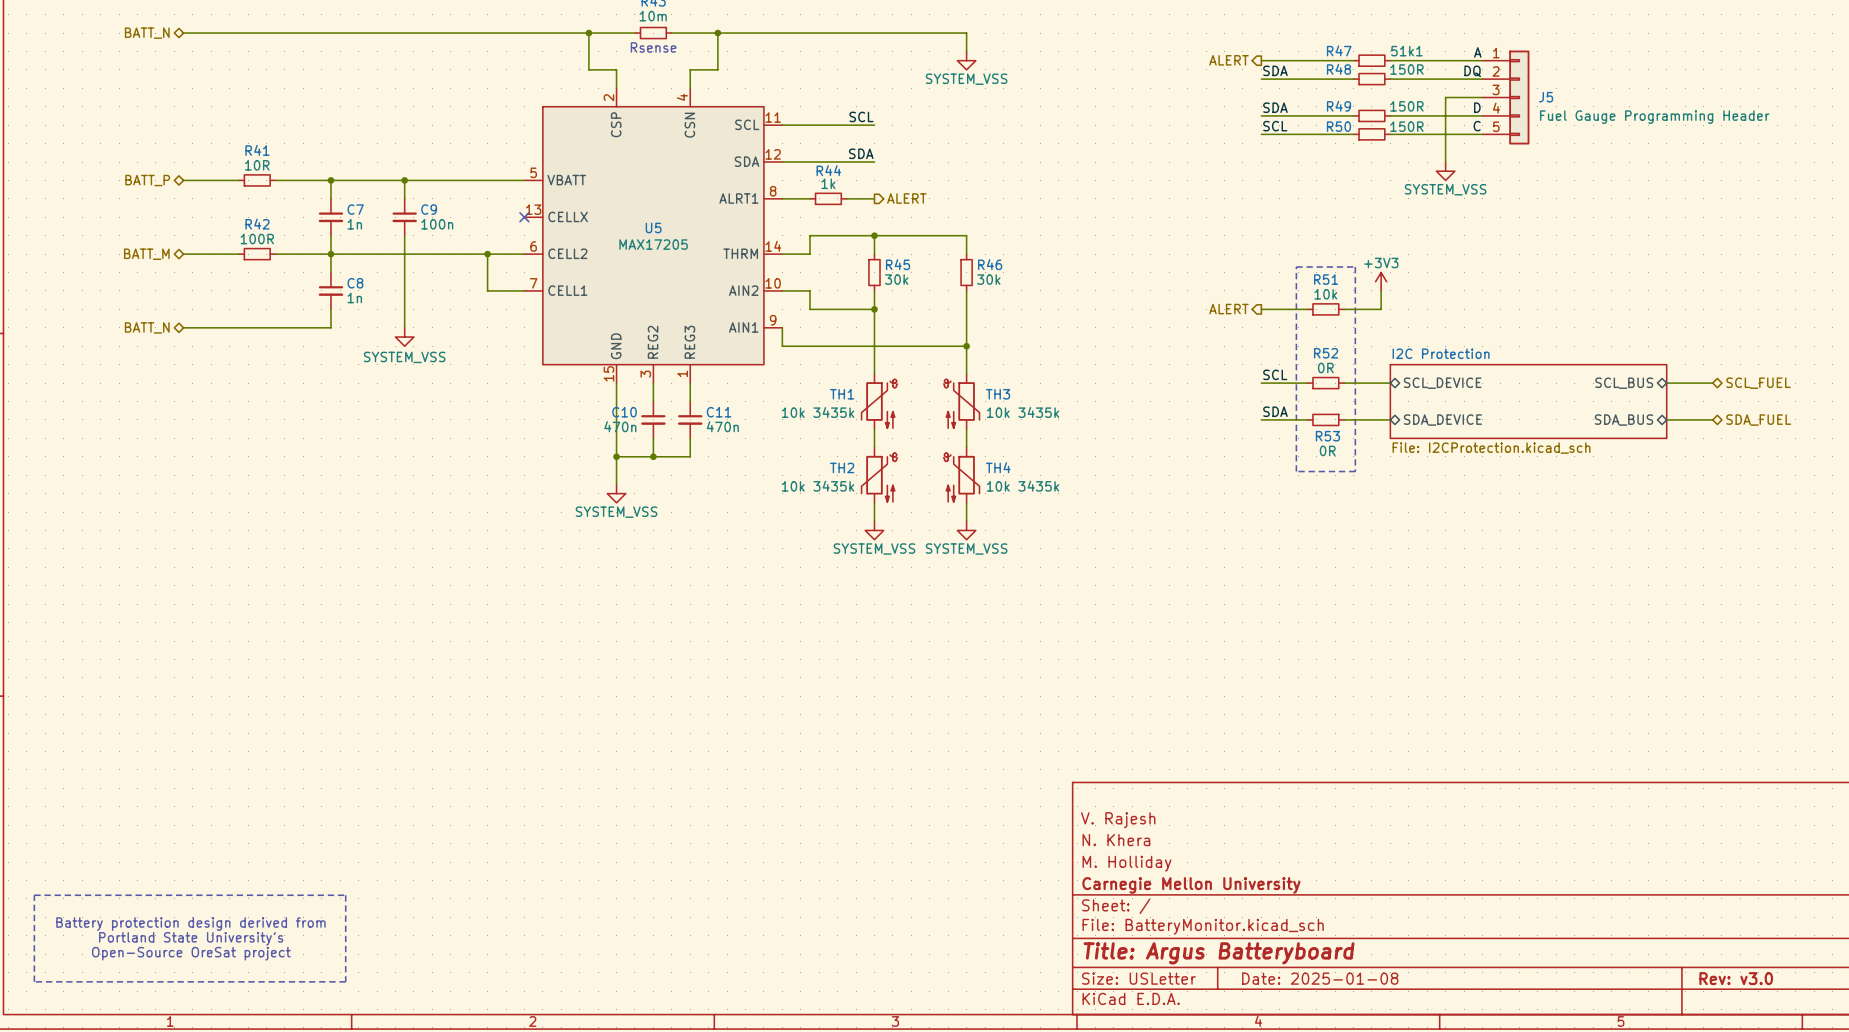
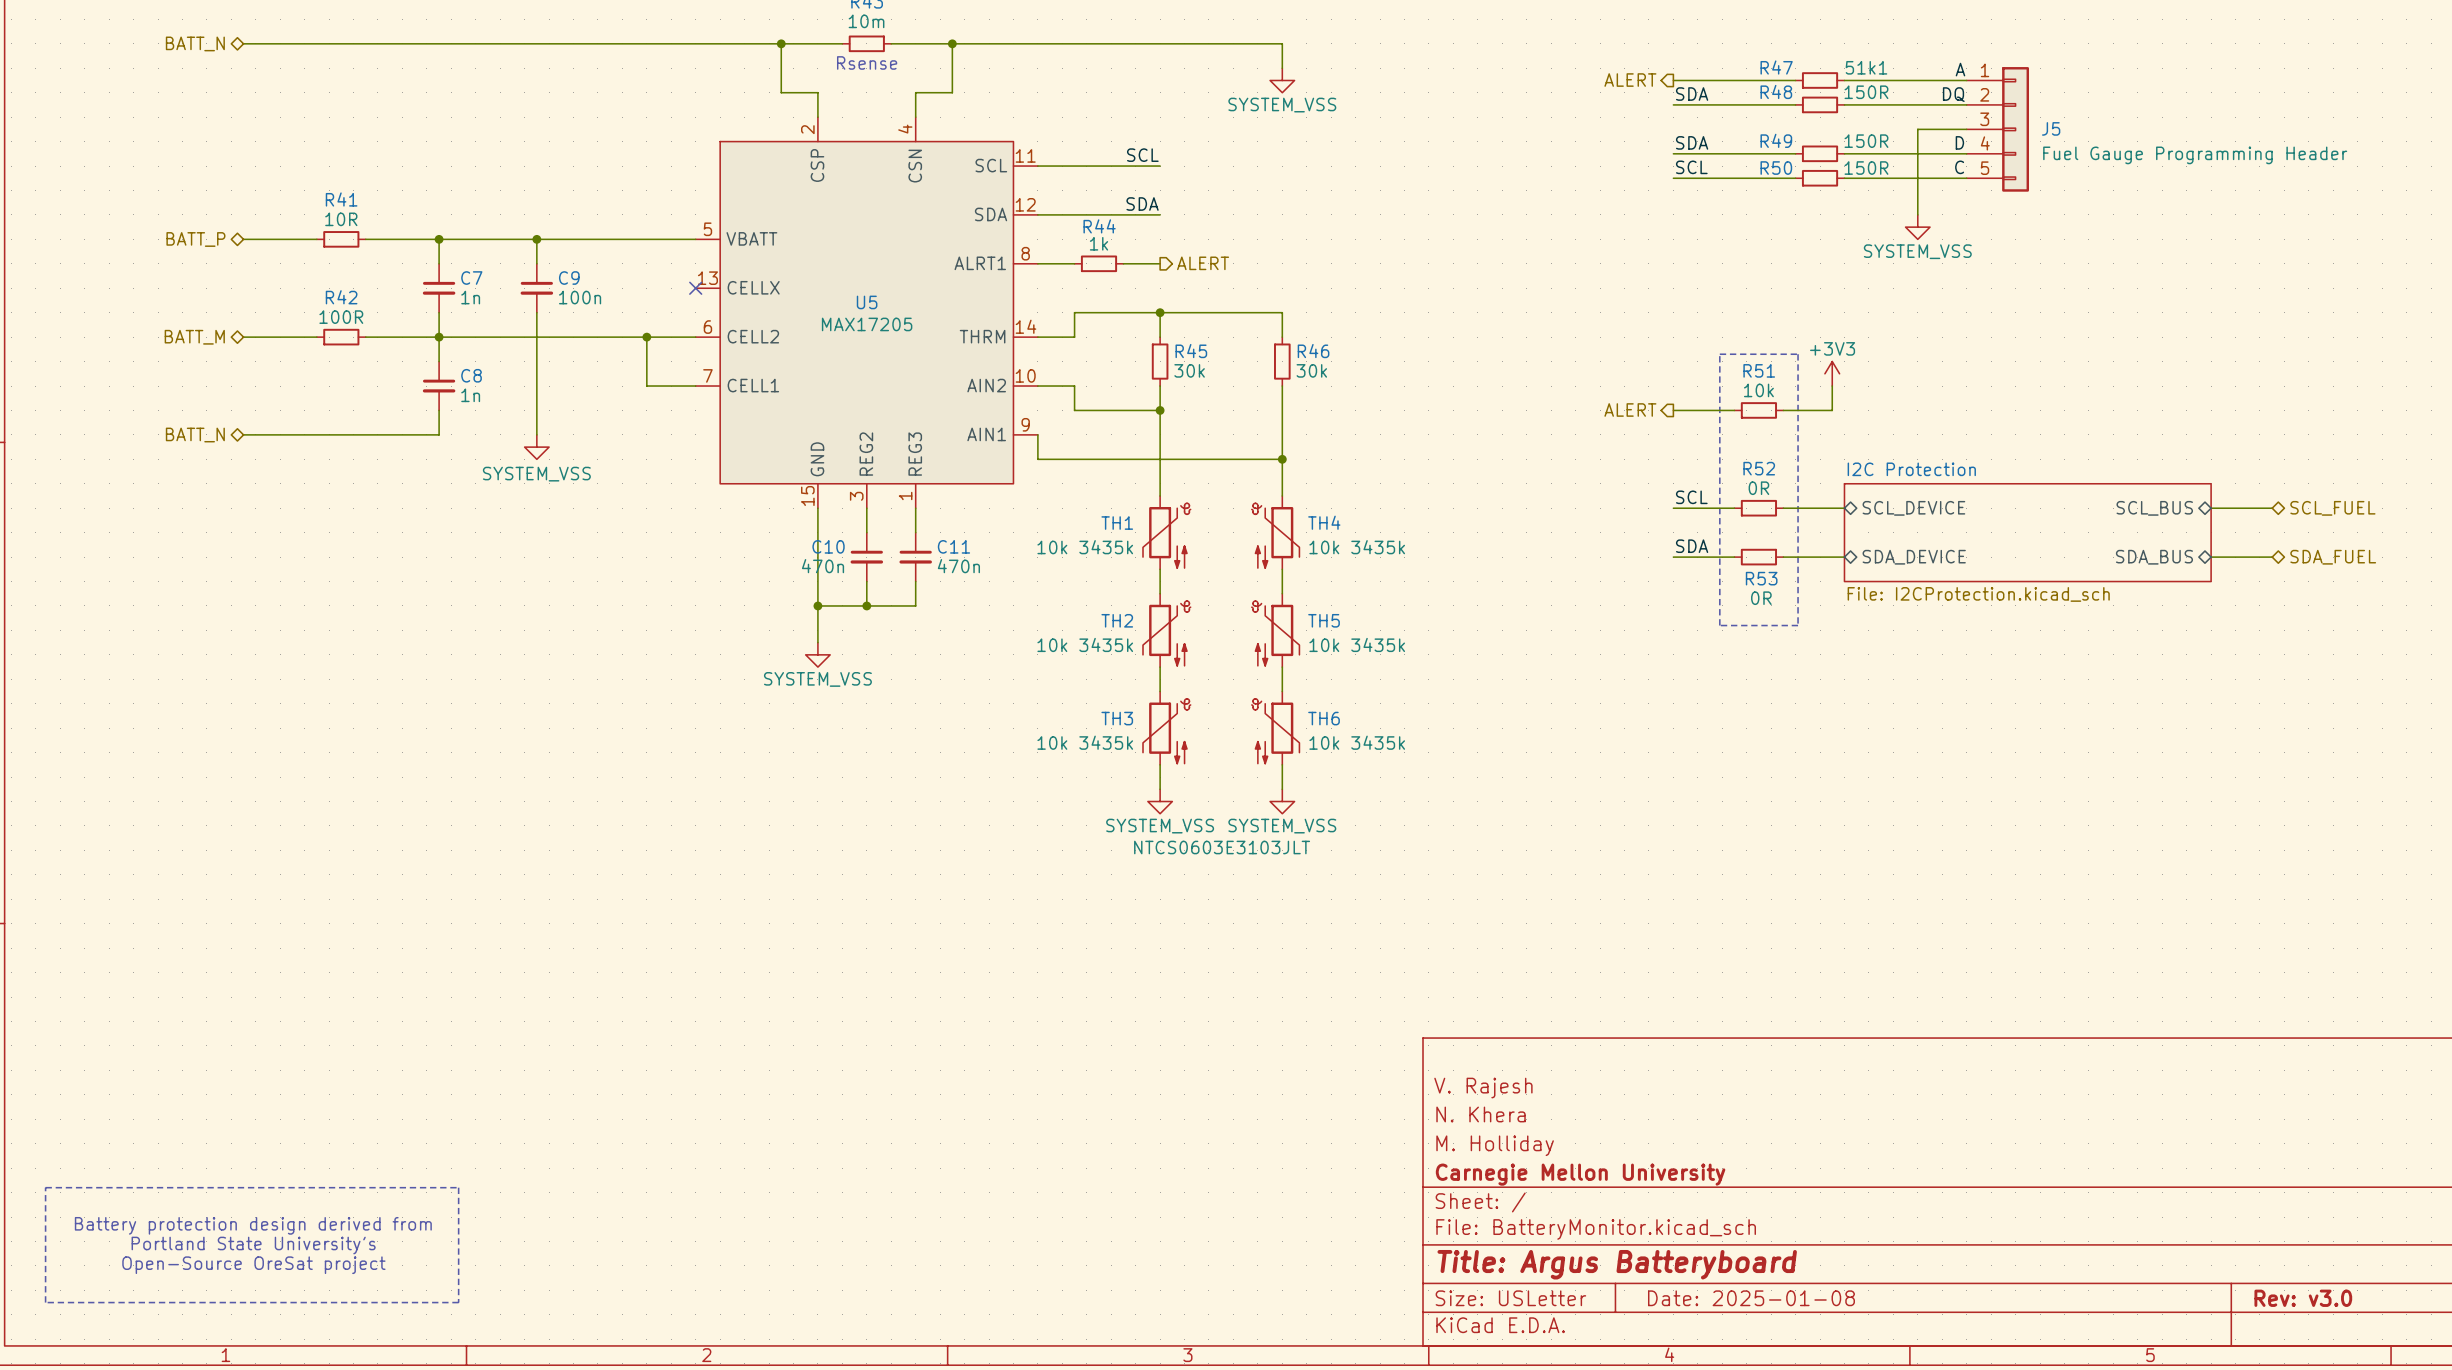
TH3 name: TH3 (998, 394) -> TH4 (1324, 522)
TH4 name: TH4 (998, 467) -> TH5 (1324, 620)
power symbol: SYSTEM_VSS (874, 530) -> none
power symbol: SYSTEM_VSS (966, 530) -> none
TH3: none -> 10k 3435k (1166, 728)
TH6: none -> 10k 3435k (1275, 728)
wire: none -> (1160, 764) (1160, 789)
wire: none -> (1282, 764) (1282, 789)
power symbol: none -> SYSTEM_VSS (1160, 801)
power symbol: none -> SYSTEM_VSS (1282, 801)
TH1 text: none -> NTCS0603E3103JLT (1222, 847)

